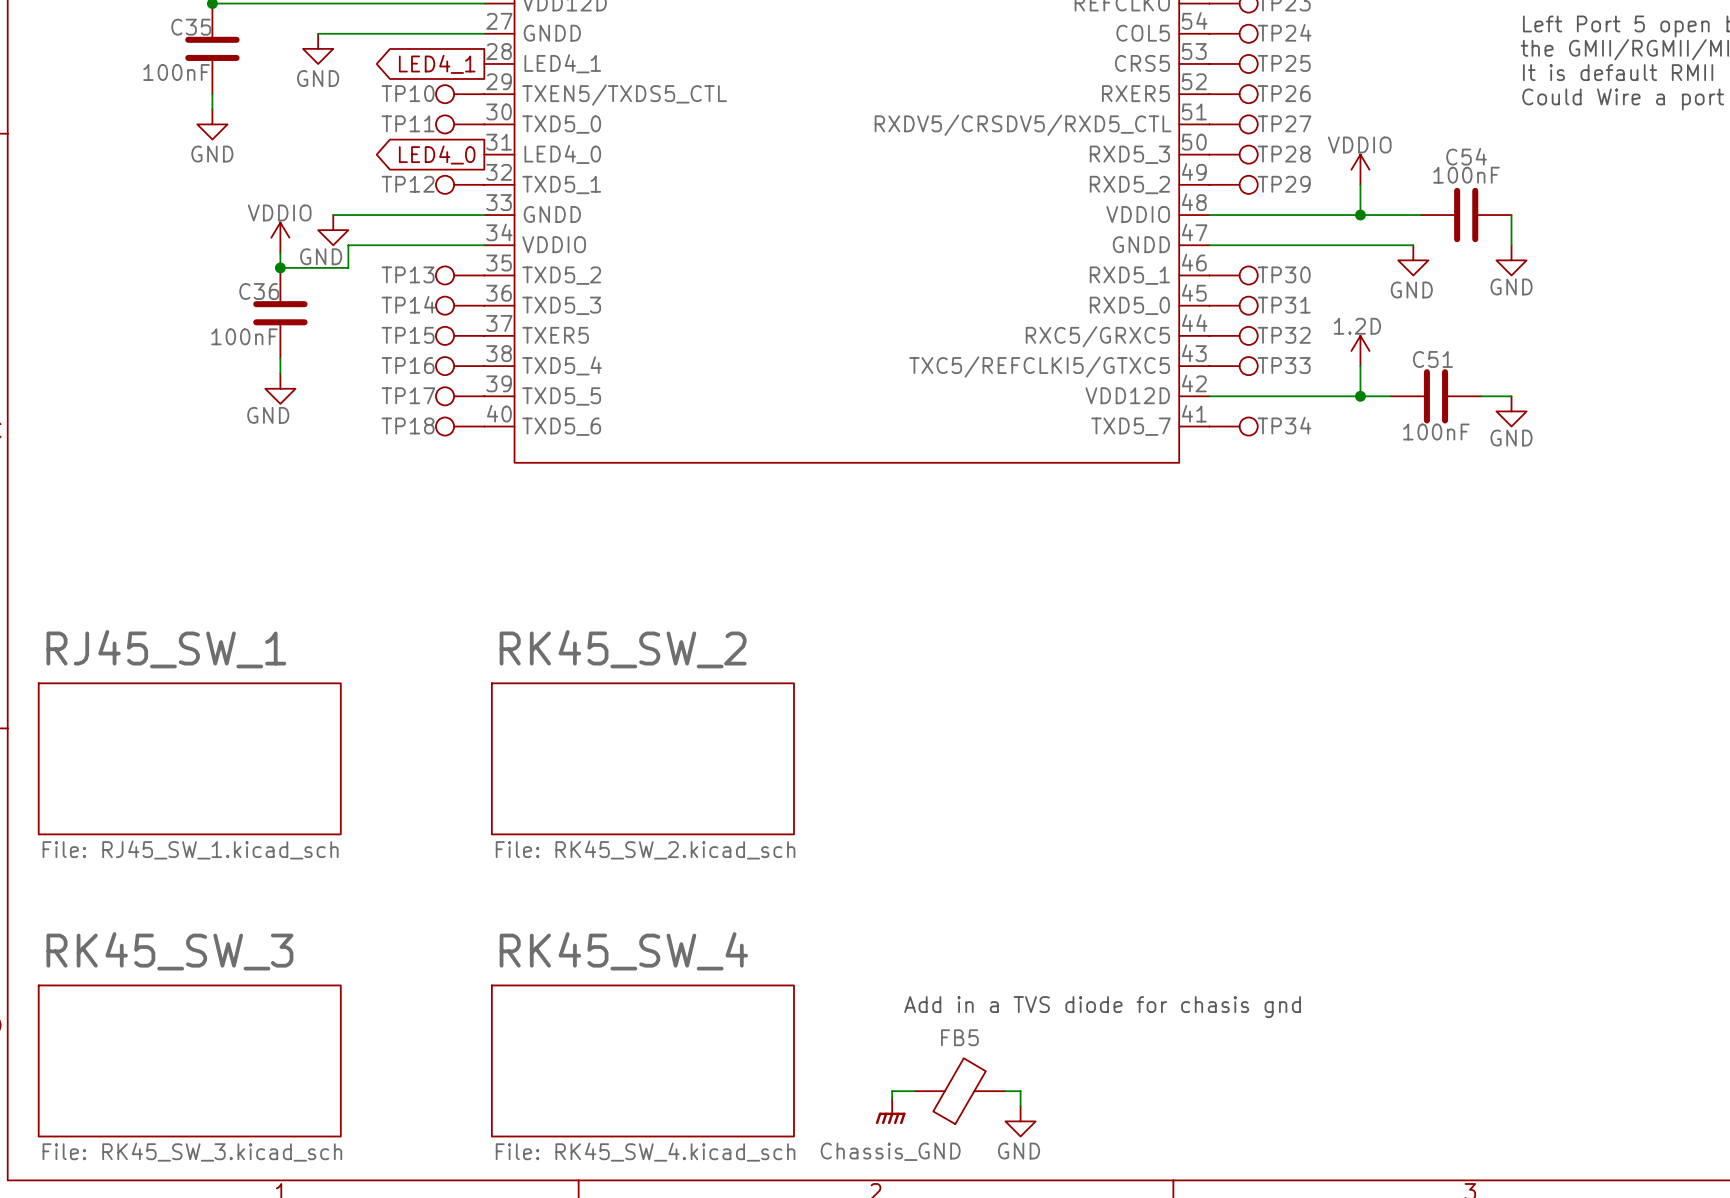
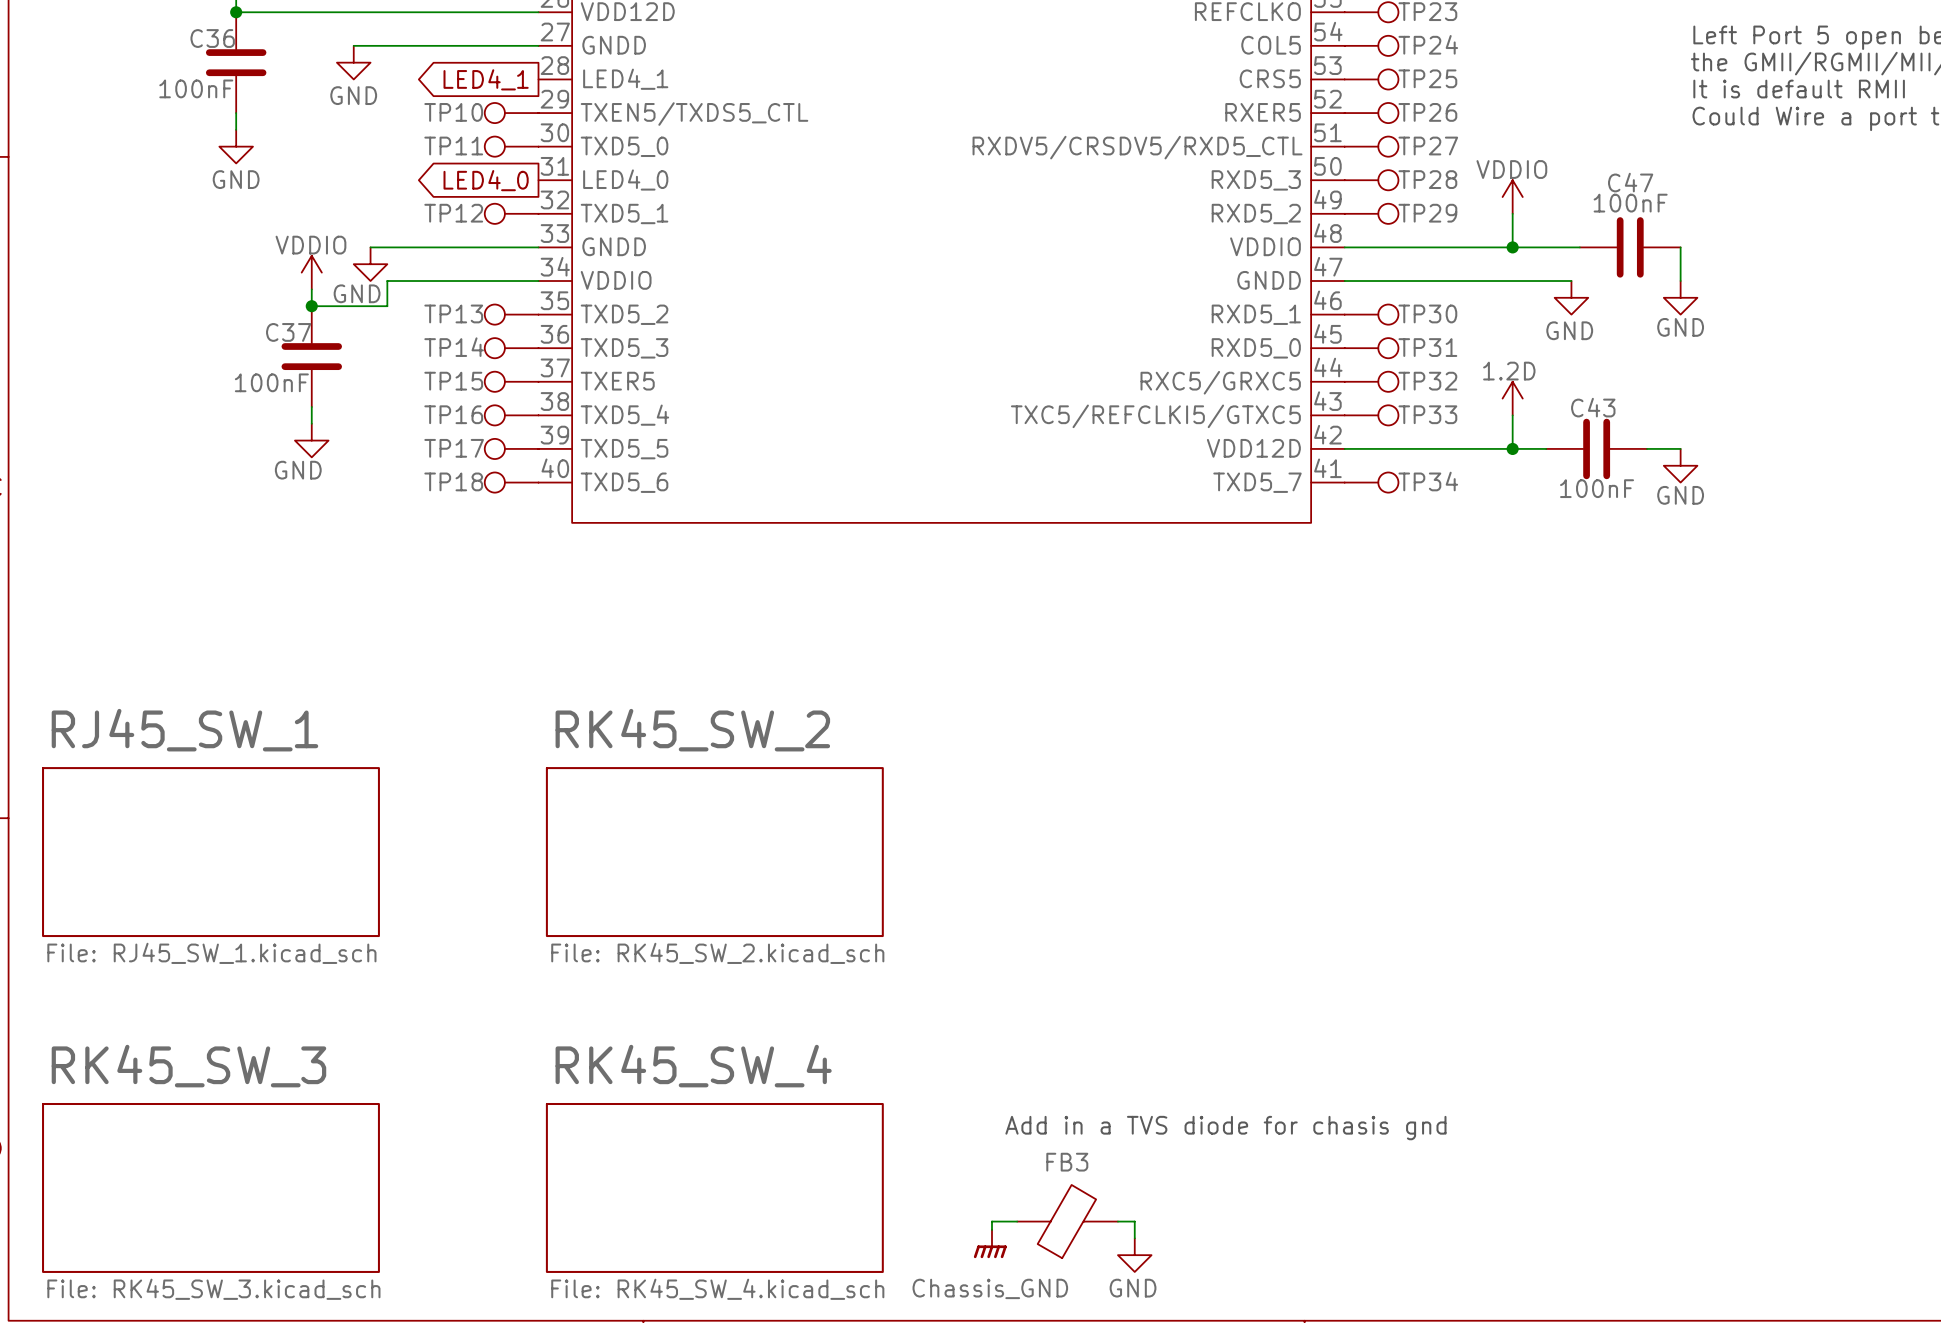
C35 name: C35 (191, 27) -> C36 (212, 38)
C54 name: C54 (1466, 156) -> C47 (1630, 182)
C36 name: C36 (259, 291) -> C37 (288, 332)
C51 name: C51 (1432, 359) -> C43 (1593, 407)
FB5 name: FB5 (959, 1037) -> FB3 (1067, 1162)

